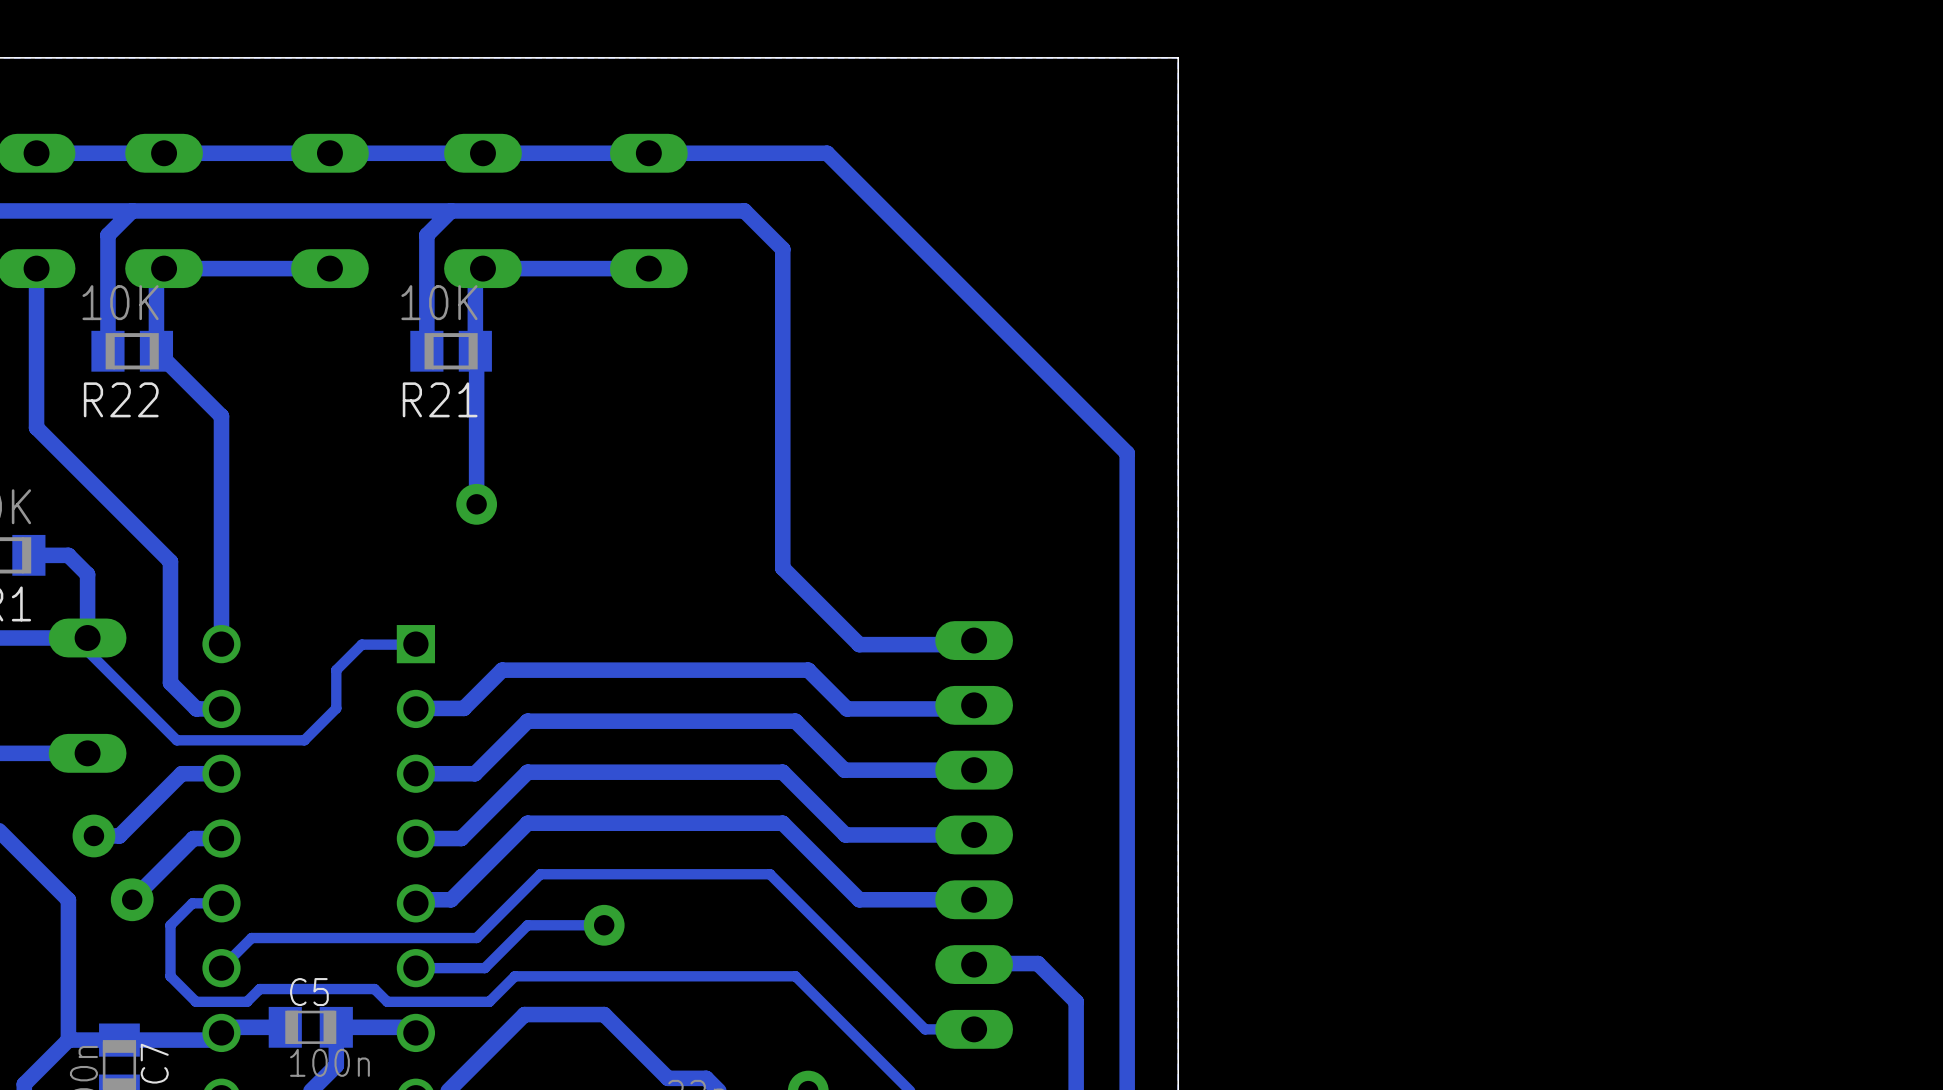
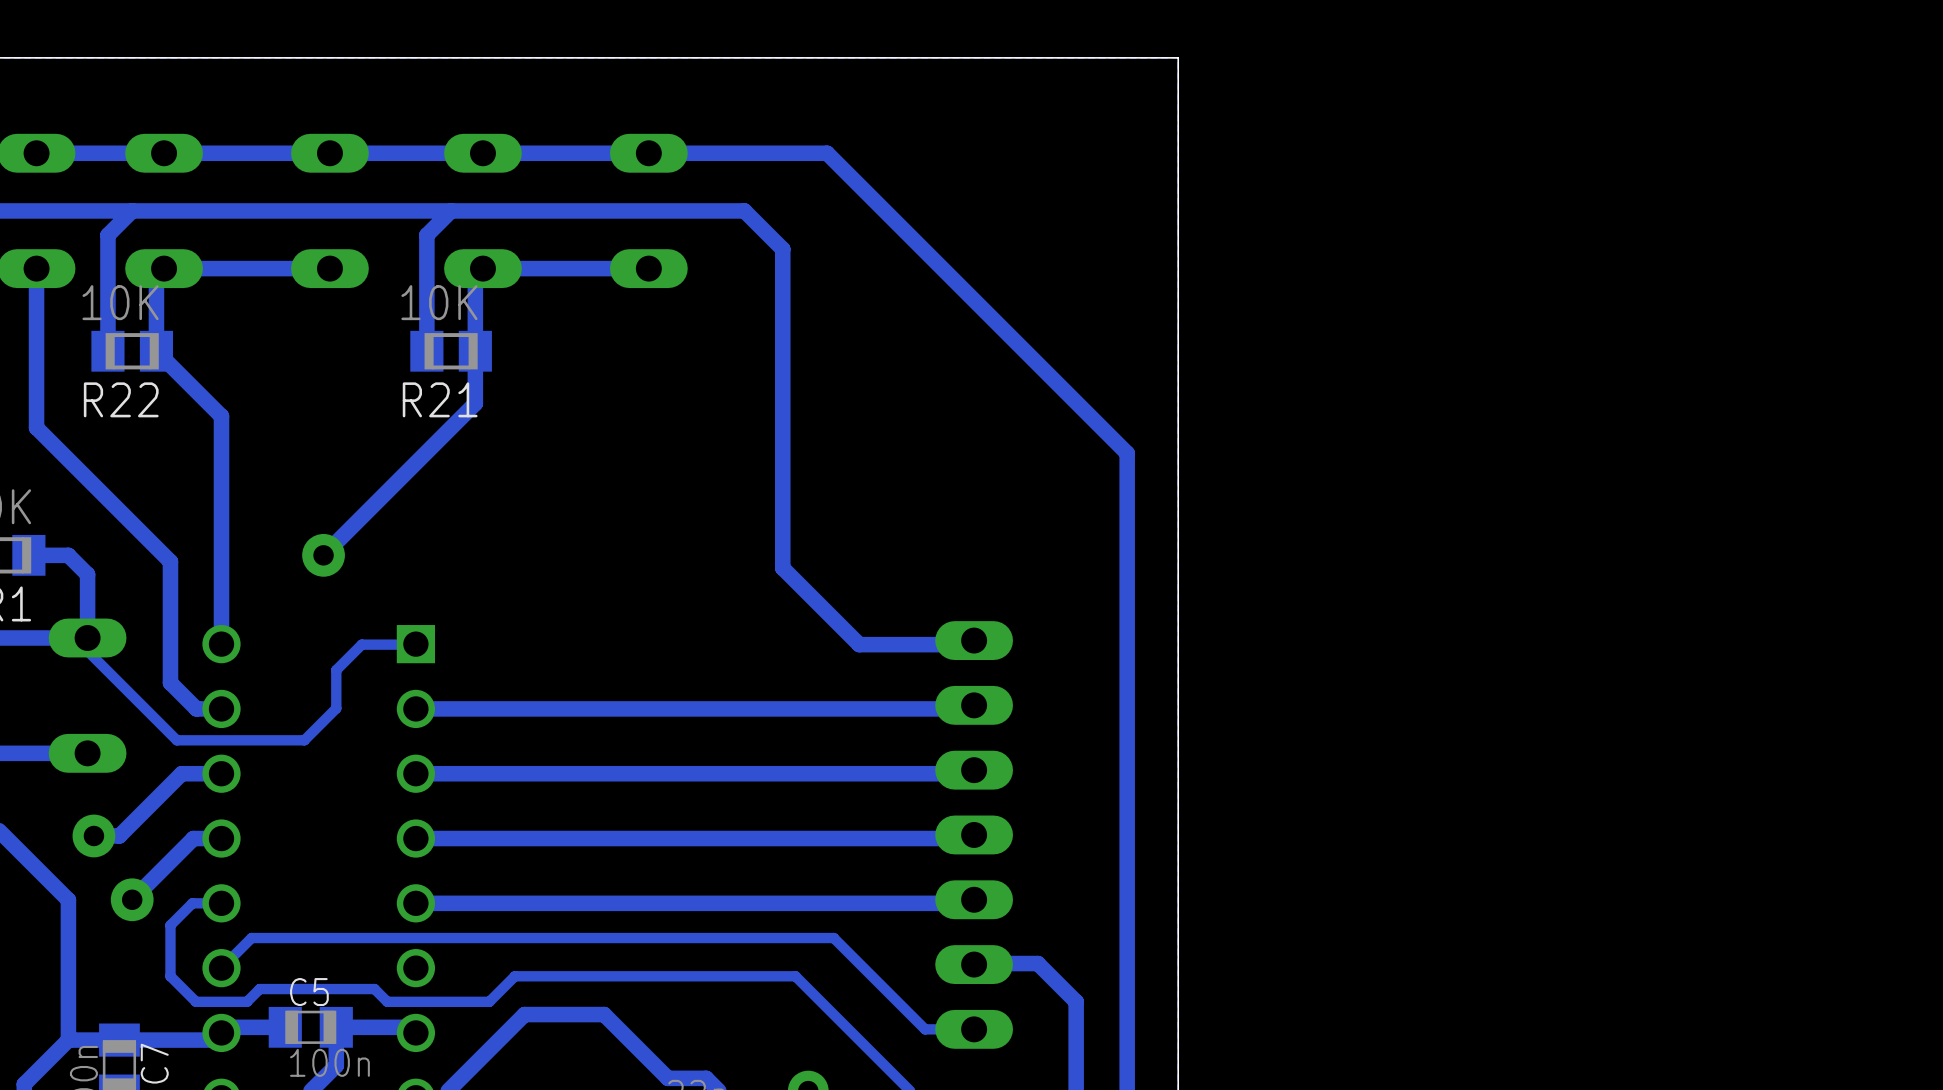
track: (475, 351) (476, 504) -> (475, 351) (475, 403) (323, 555)
via: (476, 504) -> none
via: none -> (323, 555)
track: (847, 708) (808, 670) (502, 670) (463, 708) (415, 708) -> (847, 708) (415, 708)
track: (974, 770) (844, 770) (795, 721) (527, 721) (475, 773) -> (974, 770) (970, 773) (475, 773)
track: (974, 834) (845, 834) (782, 772) (527, 772) (461, 838) -> (974, 834) (970, 838) (461, 838)
track: (974, 899) (859, 899) (782, 823) (527, 823) (451, 899) (419, 899) (415, 903) -> (974, 899) (970, 903) (415, 903)
track: (604, 925) (527, 925) (484, 968) (415, 968) -> none
via: (604, 925) -> none
track: (833, 938) (770, 874) (540, 874) (476, 938) -> (833, 938) (476, 938)

